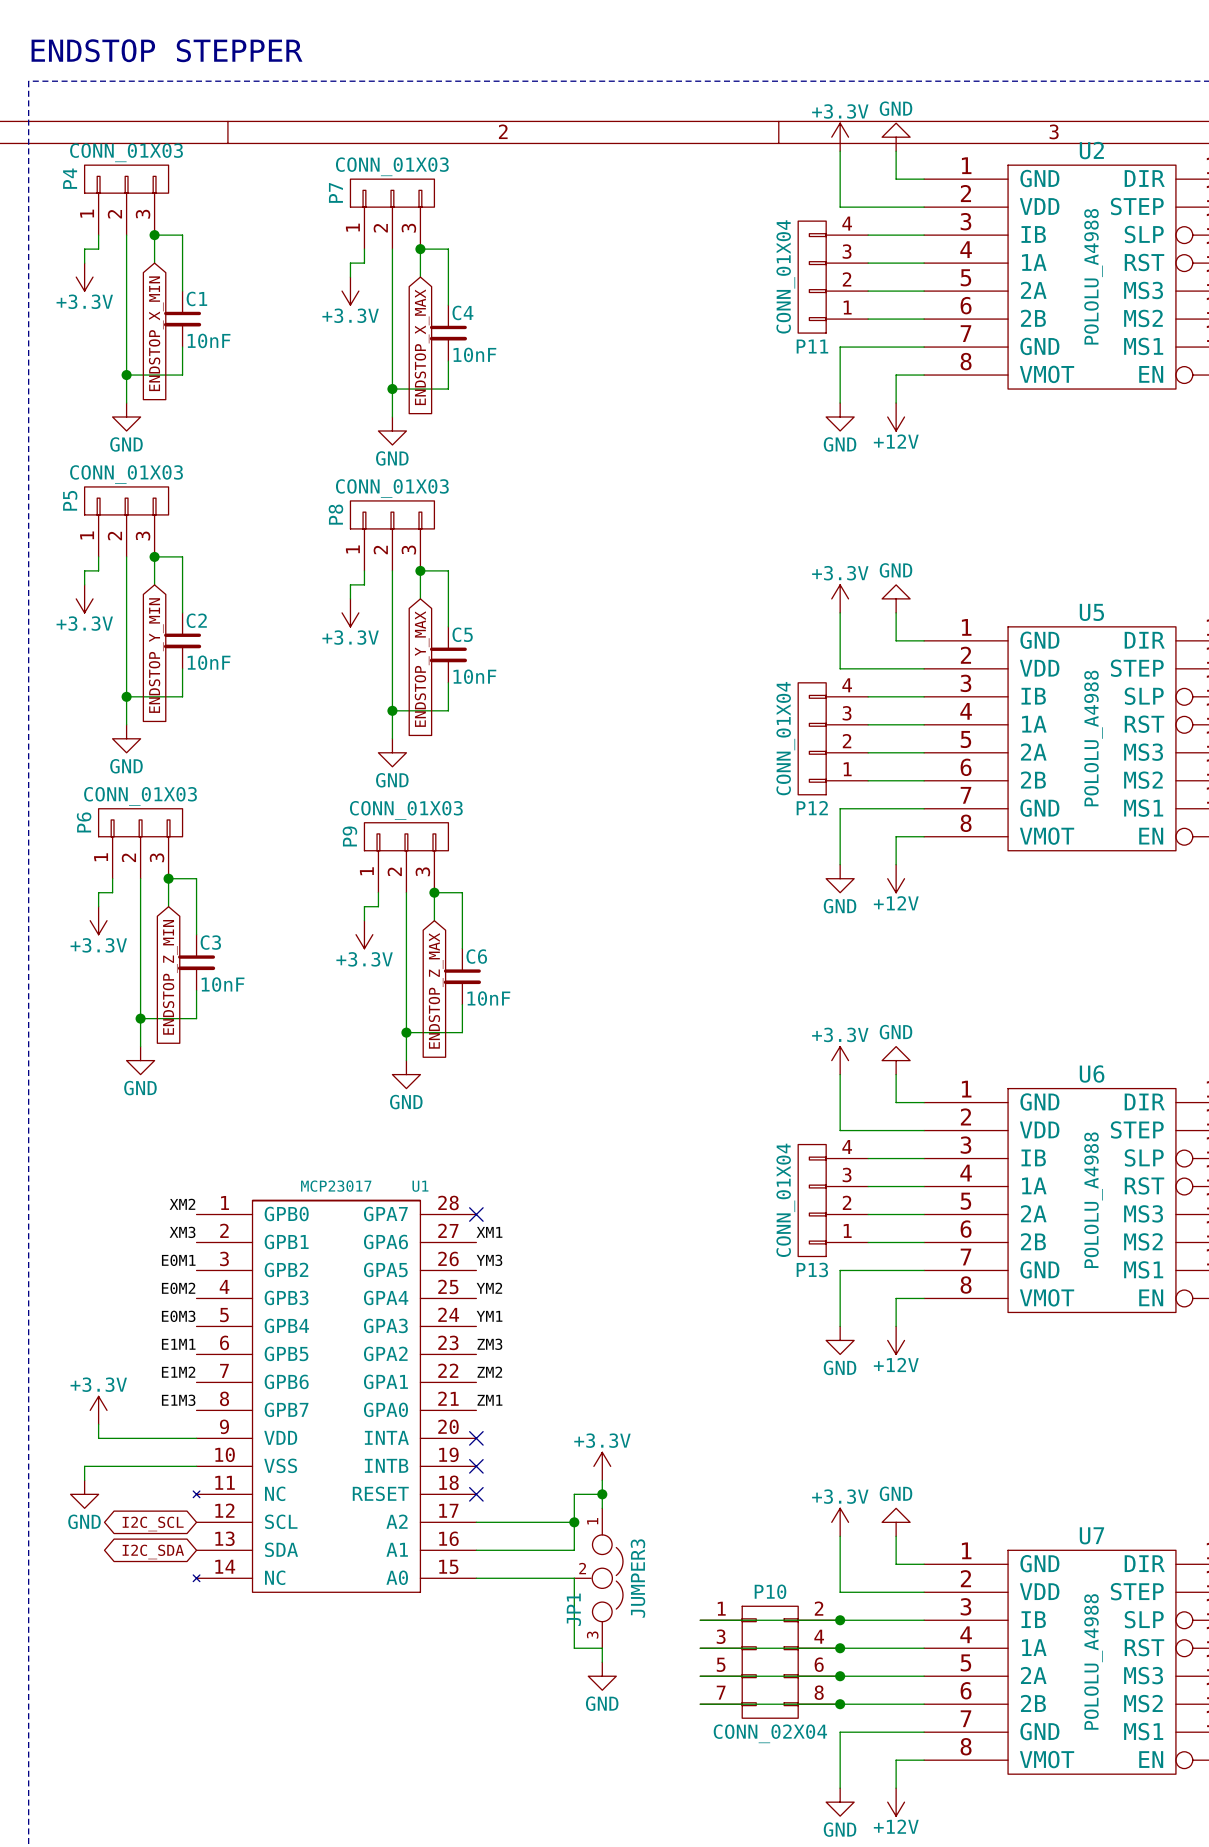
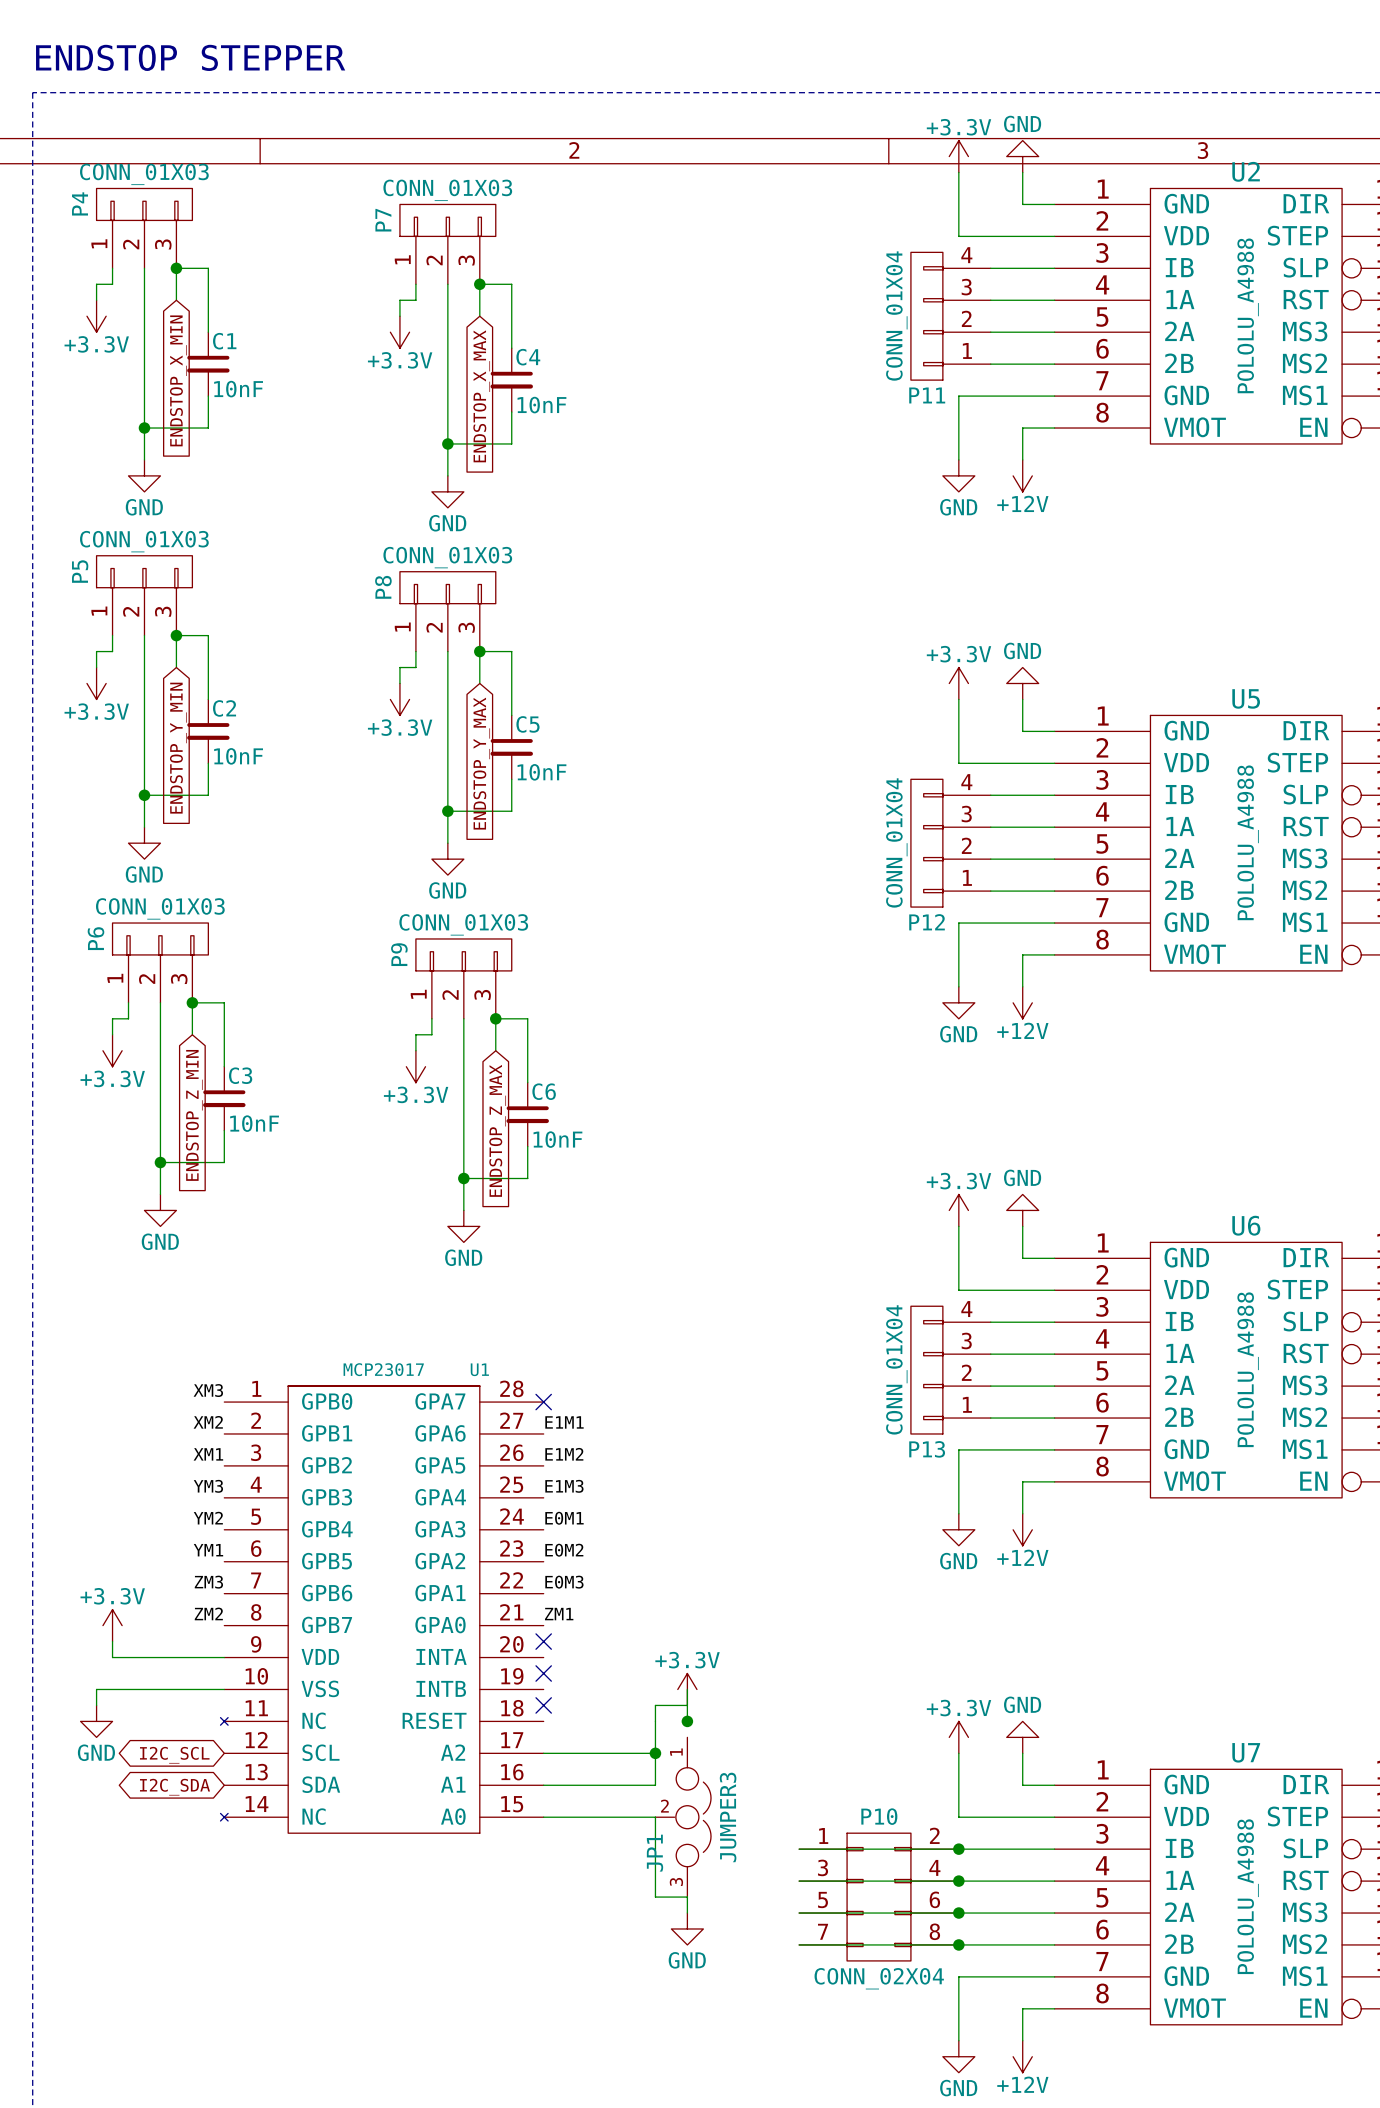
label position: XM2 (182, 1204) -> XM2 (208, 1422)
no-connect mark position: (476, 1214) -> (543, 1402)
label position: XM3 (182, 1232) -> XM3 (208, 1390)
label: XM1 (489, 1232) -> none
label: none -> E1M1 (564, 1422)
label: E0M1 (178, 1260) -> none
label: YM3 (489, 1260) -> none
label: none -> XM1 (208, 1454)
label: none -> E1M2 (564, 1454)
label: E0M2 (178, 1288) -> none
label: YM2 (489, 1288) -> none
label: none -> YM3 (208, 1486)
label: none -> E1M3 (564, 1486)
label: E0M3 (178, 1316) -> none
label: YM1 (489, 1316) -> none
label: none -> YM2 (208, 1518)
label: none -> E0M1 (564, 1518)
label: E1M1 (178, 1344) -> none
label: ZM3 (489, 1344) -> none
label: none -> YM1 (208, 1550)
label: none -> E0M2 (564, 1550)
label: E1M2 (178, 1372) -> none
label: ZM2 (489, 1372) -> none
label: none -> ZM3 (208, 1582)
label: none -> E0M3 (564, 1582)
U1 position: (334, 1396) -> (382, 1609)
label: E1M3 (178, 1400) -> none
label position: ZM1 (489, 1400) -> ZM1 (559, 1614)
power symbol position: +3.3V (98, 1410) -> +3.3V (112, 1625)
label: none -> ZM2 (208, 1613)
wire: (98, 1424) (98, 1438) (196, 1438) -> (112, 1641) (112, 1657) (224, 1657)
wire: (196, 1466) (84, 1466) (84, 1480) -> (224, 1689) (96, 1689) (96, 1705)
power symbol position: +3.3V (602, 1466) -> +3.3V (687, 1689)
power symbol position: GND (84, 1494) -> GND (96, 1721)
junction position: (602, 1494) -> (687, 1721)
wire: (476, 1522) (574, 1522) -> (543, 1753) (655, 1753)
junction position: (574, 1522) -> (655, 1753)
global label position: I2C_SCL (153, 1523) -> I2C_SCL (174, 1755)
wire: (476, 1550) (574, 1550) -> (543, 1785) (655, 1785) (655, 1769)
global label position: I2C_SDA (153, 1551) -> I2C_SDA (174, 1787)
wire: (476, 1578) (574, 1578) (574, 1592) -> (543, 1817) (655, 1817)
JP1 position: (598, 1578) -> (683, 1817)
wire: (574, 1648) (602, 1648) (602, 1662) -> (655, 1881) (655, 1897) (687, 1897) (687, 1913)
power symbol position: GND (602, 1676) -> GND (687, 1928)

